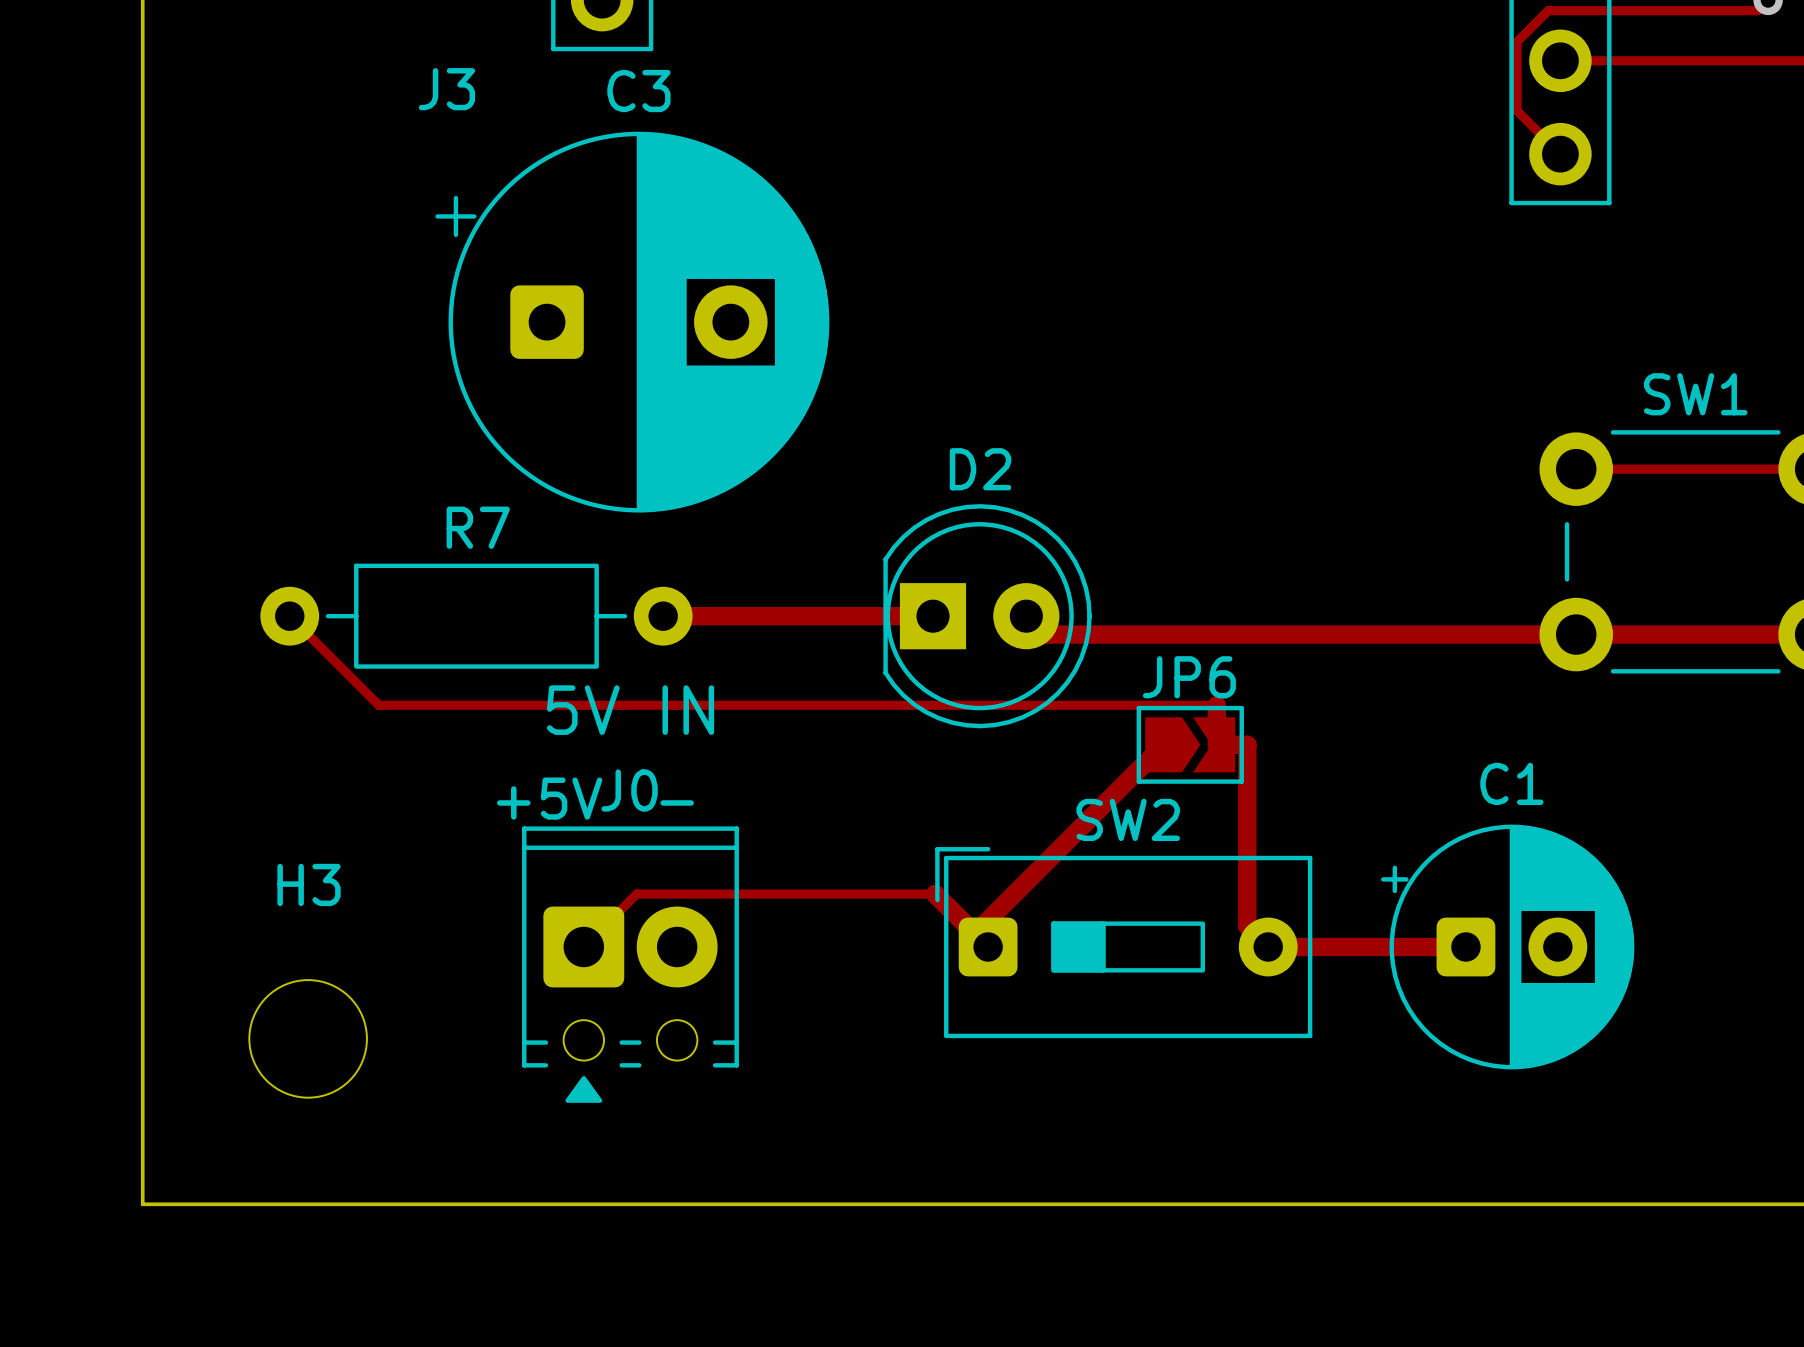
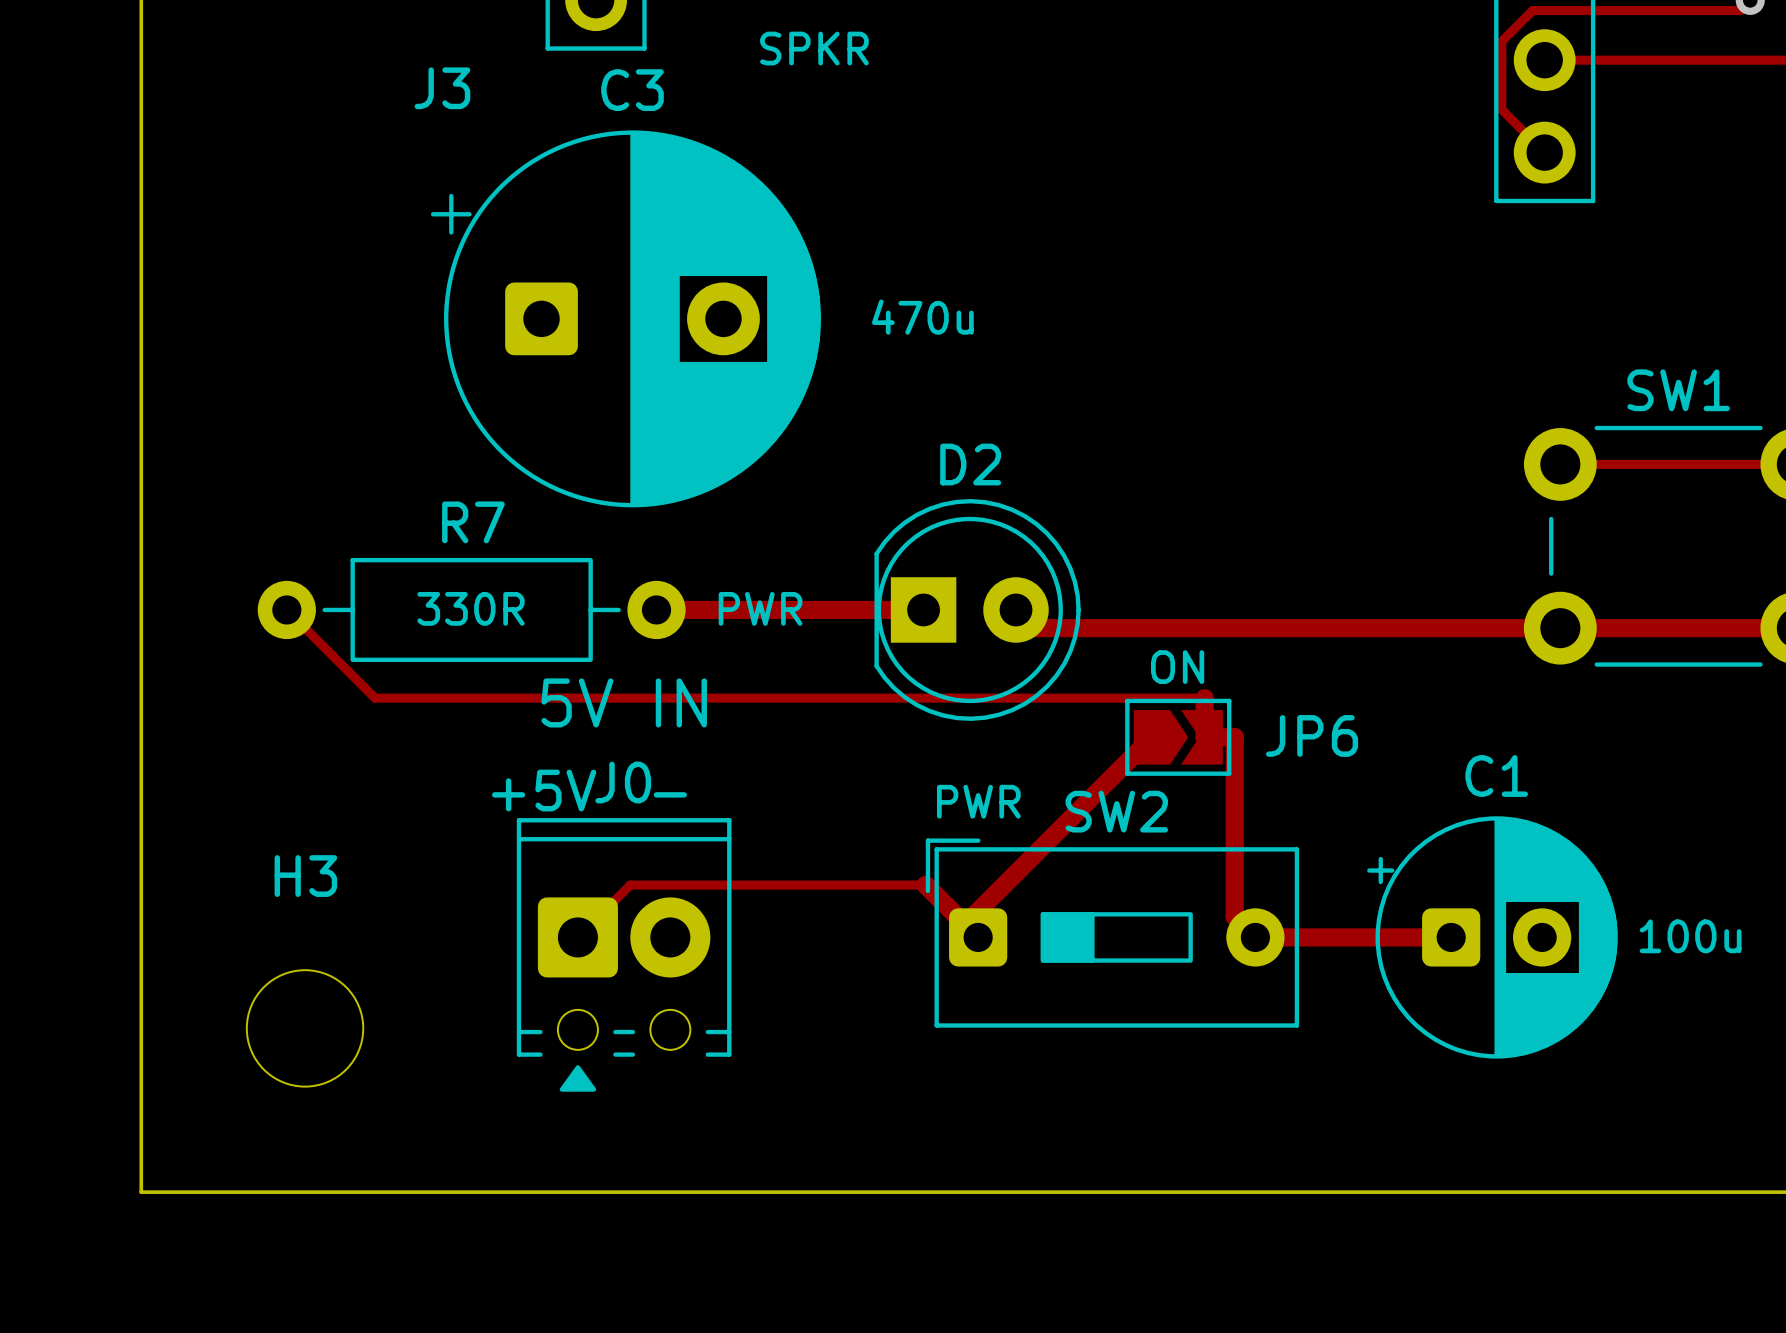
text: none -> SPKR (814, 48)
text: none -> 470u (922, 317)
text: none -> 330R (470, 608)
text: none -> PWR (760, 608)
text: none -> ON (1177, 667)
JP6 name position: JP6 (1189, 677) -> JP6 (1312, 735)
text: none -> PWR (978, 801)
text: none -> 100u (1690, 936)

